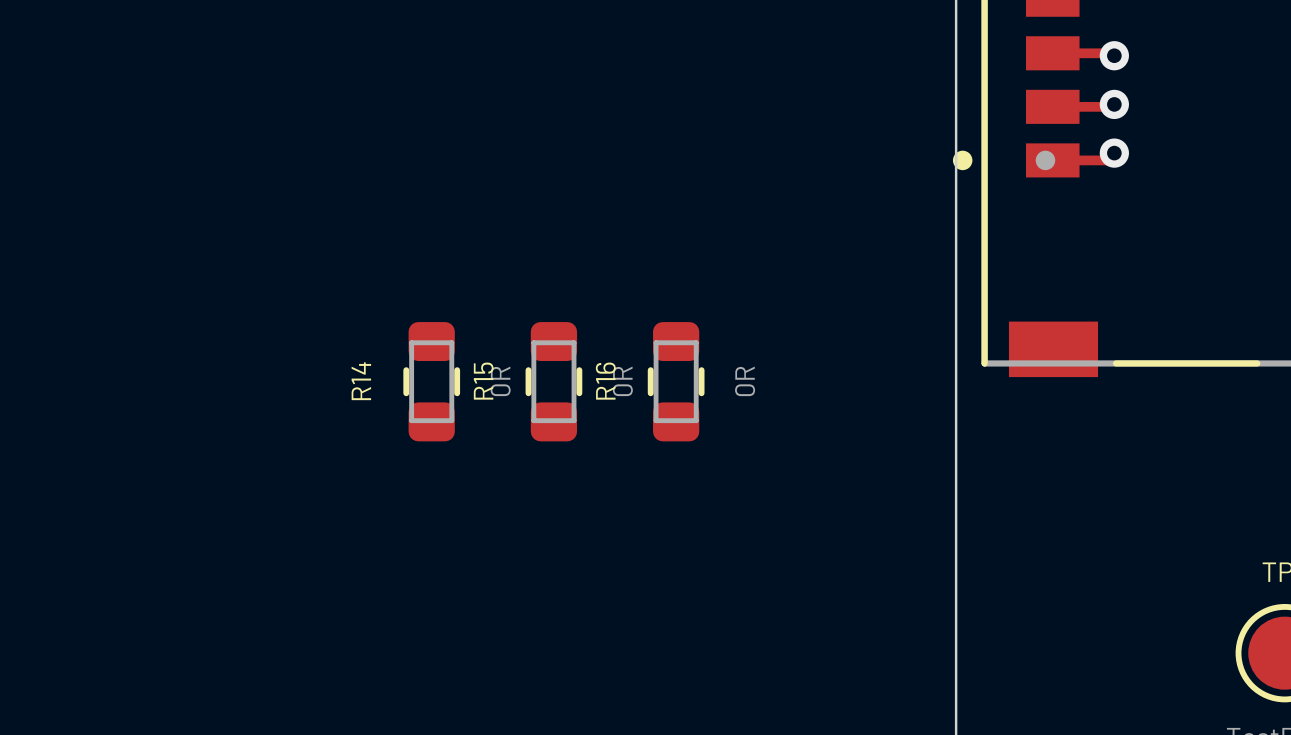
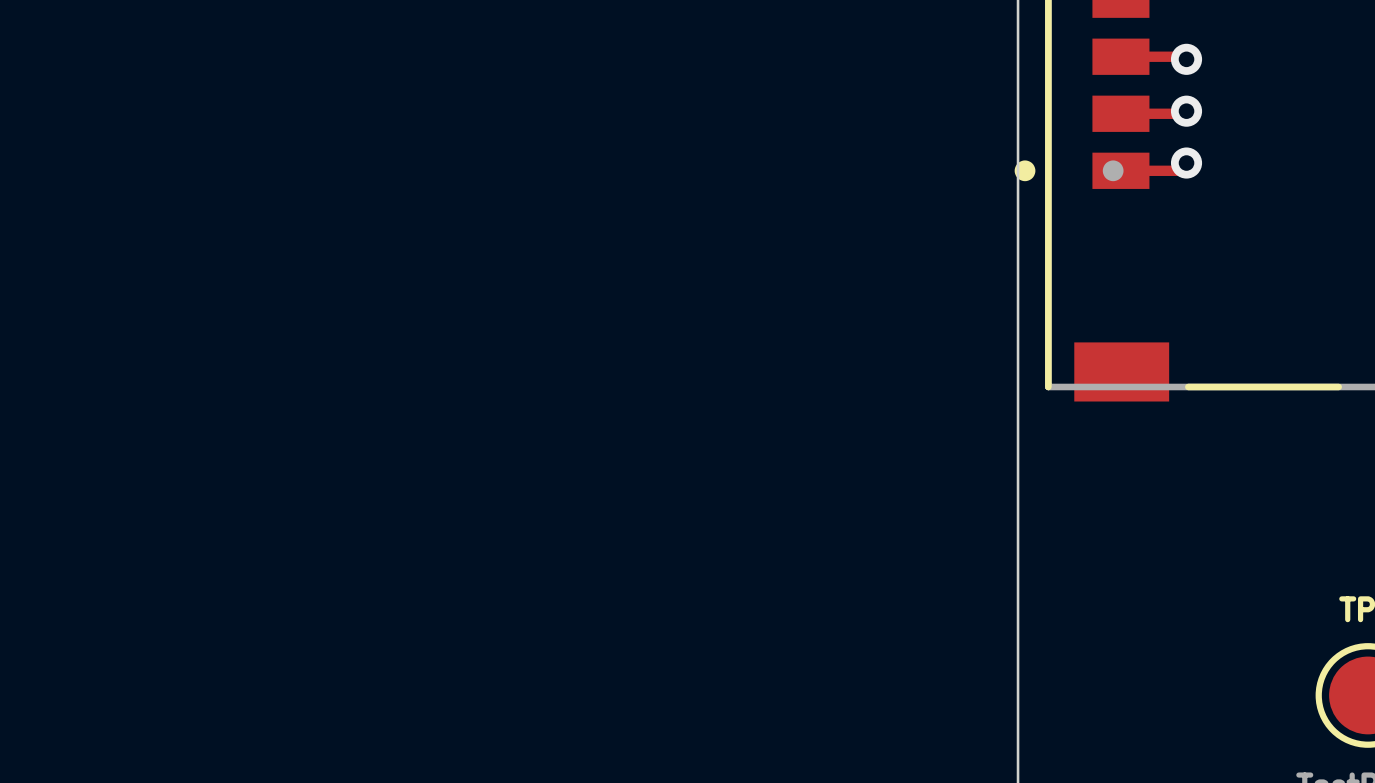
R14: 0R (431, 381) -> none
R15: 0R (553, 381) -> none
R16: 0R (676, 381) -> none

